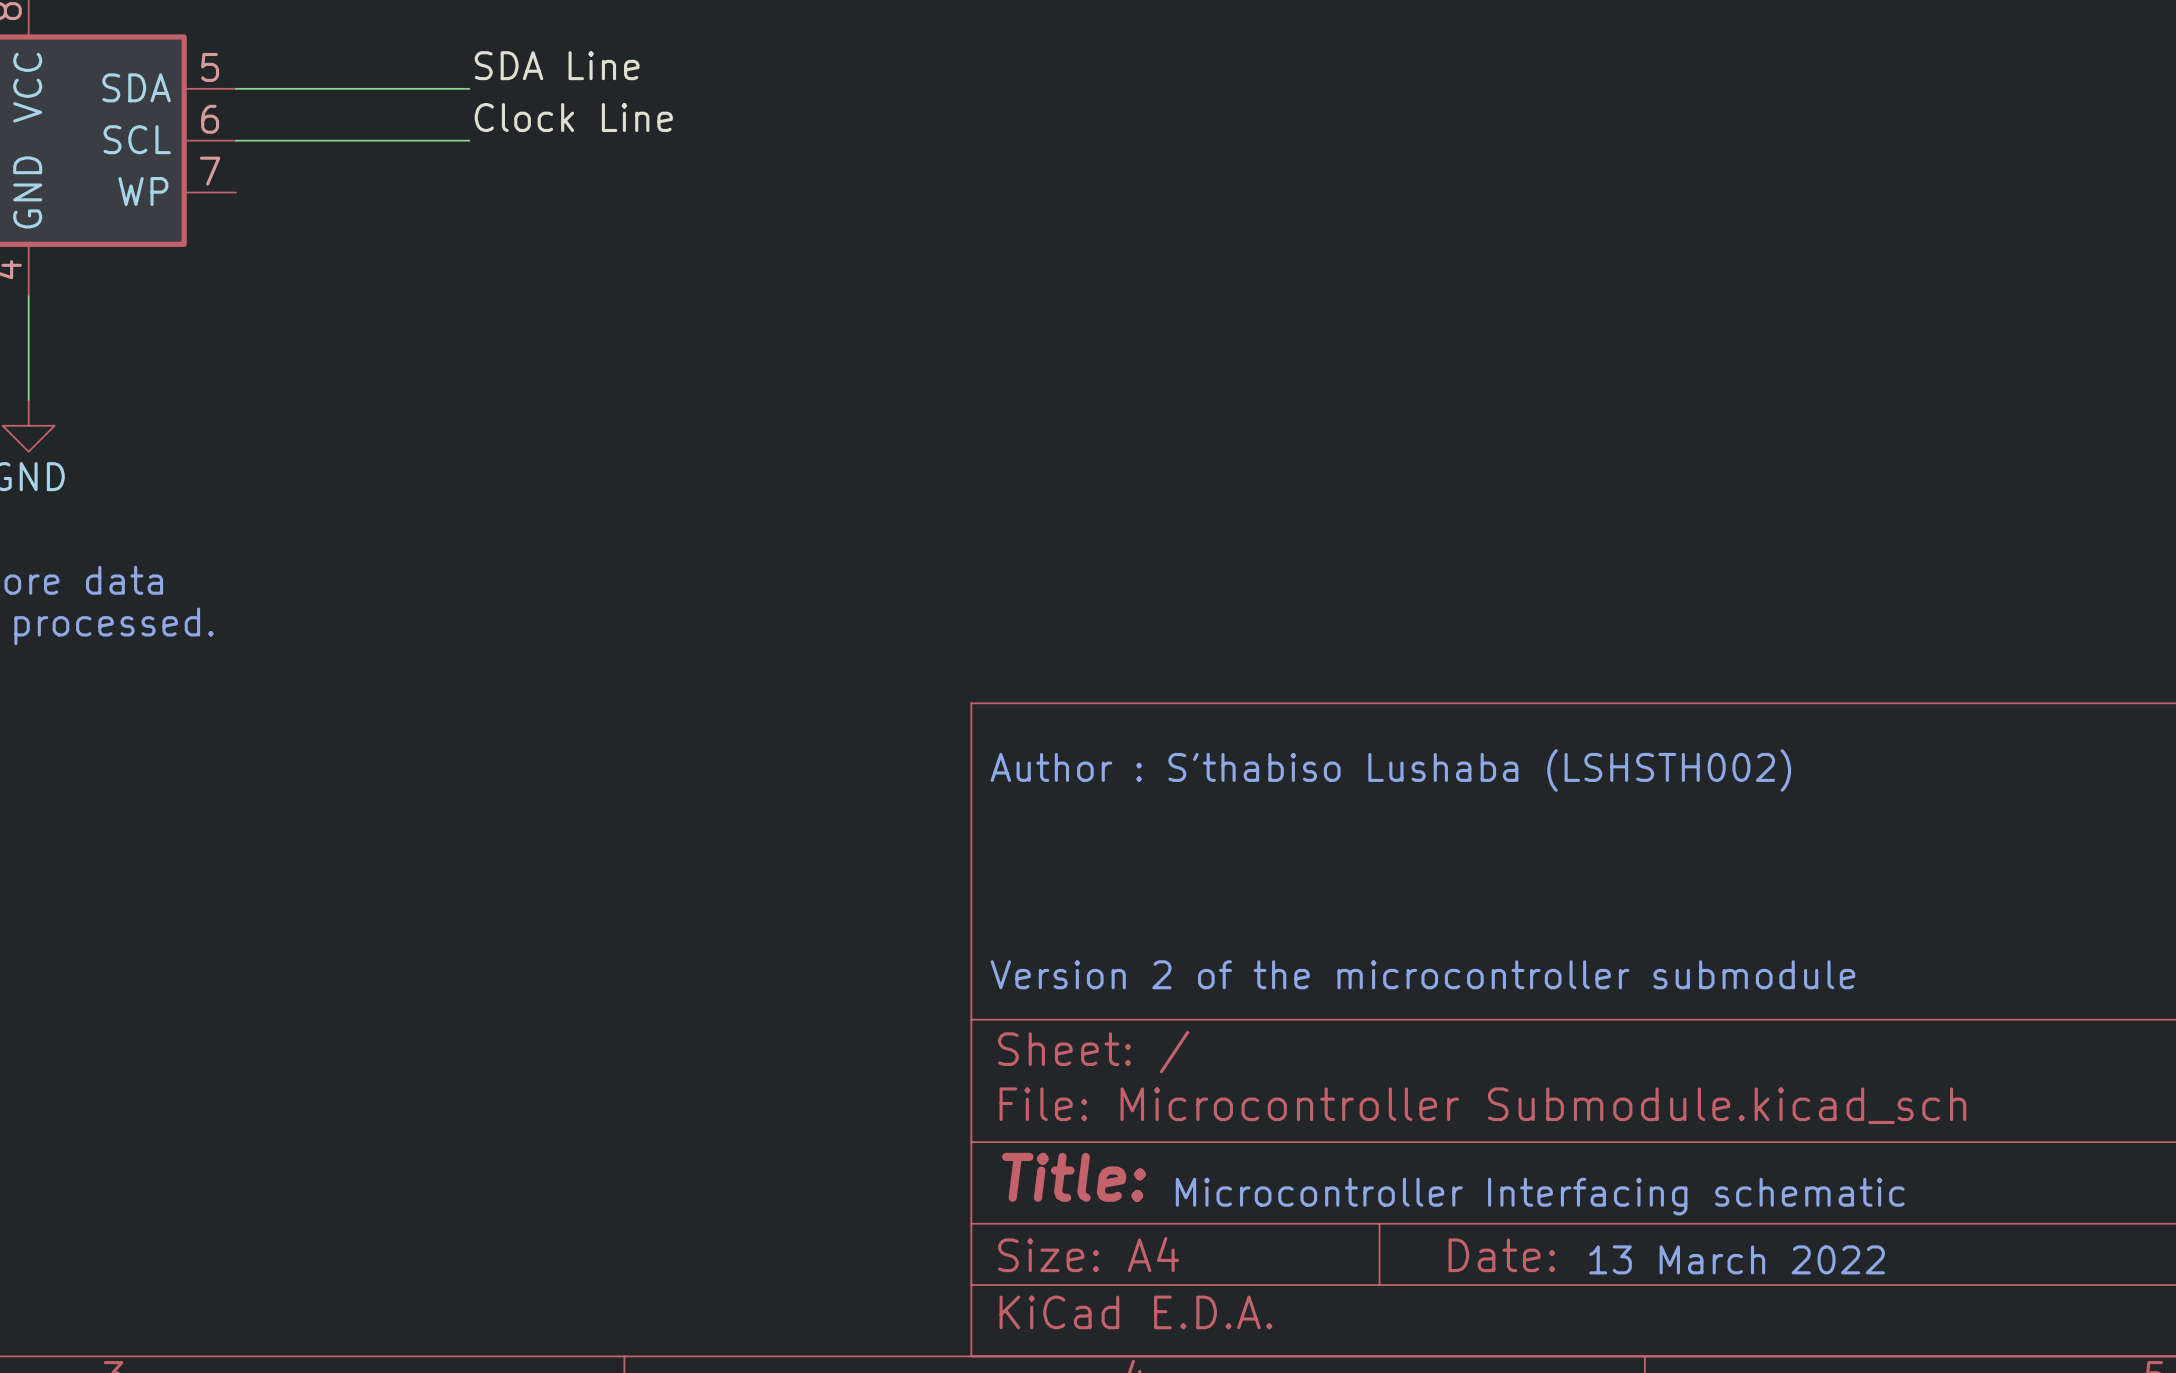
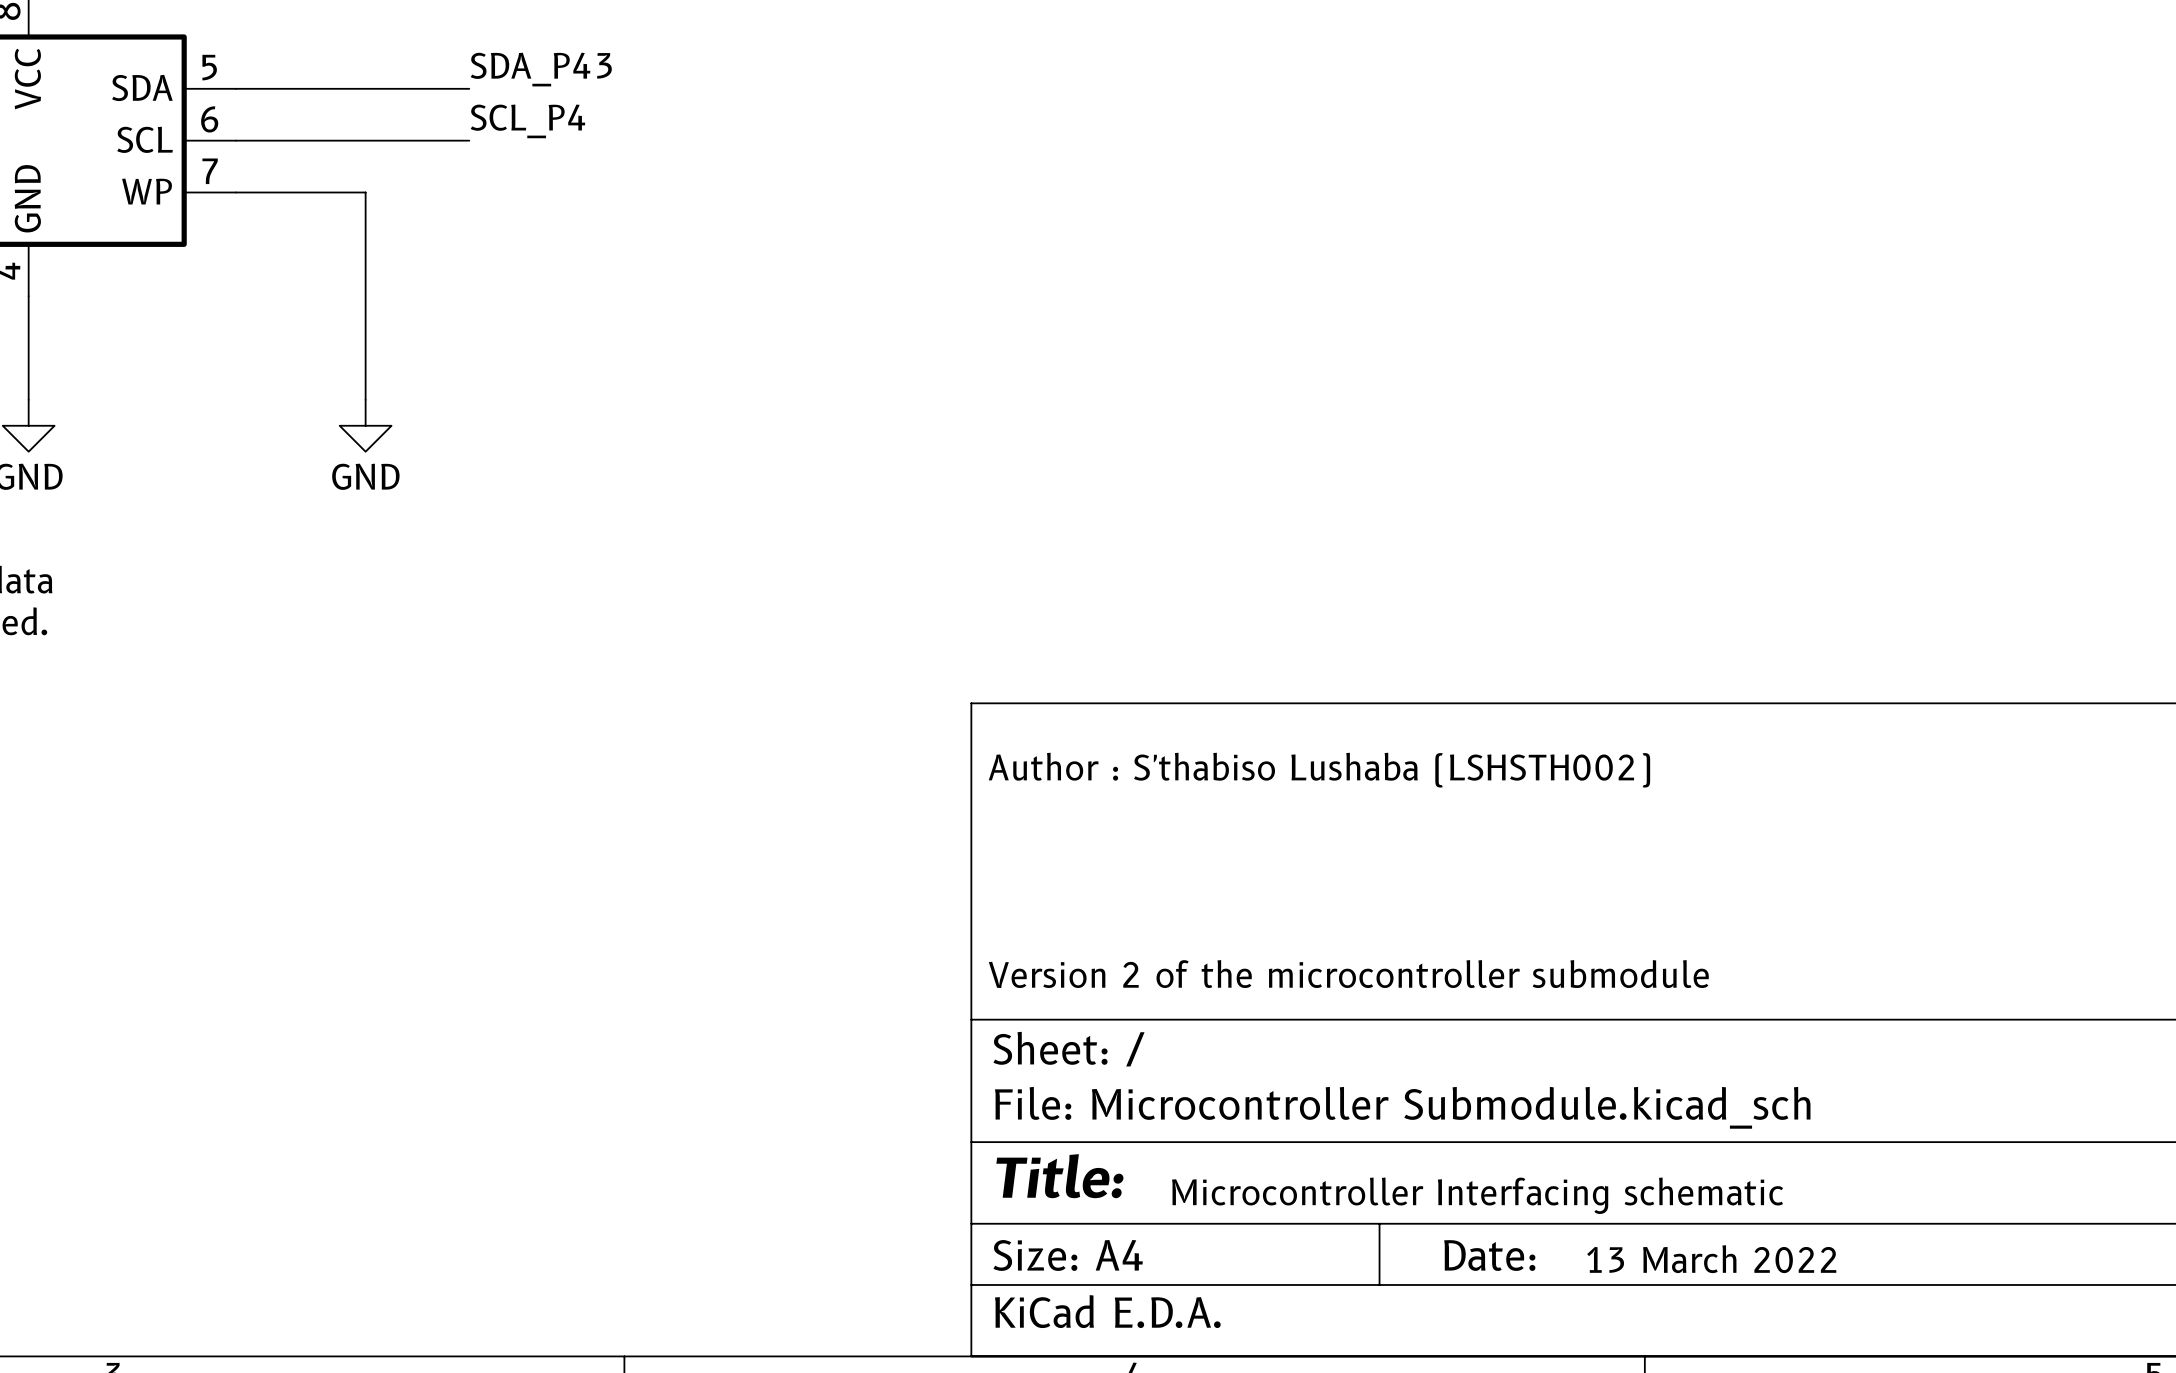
label: SDA Line (557, 65) -> SDA_P43 (541, 69)
label: Clock Line (573, 117) -> SCL_P4 (527, 121)
wire: none -> (236, 192) (365, 192) (365, 399)
power symbol: none -> GND (365, 425)

